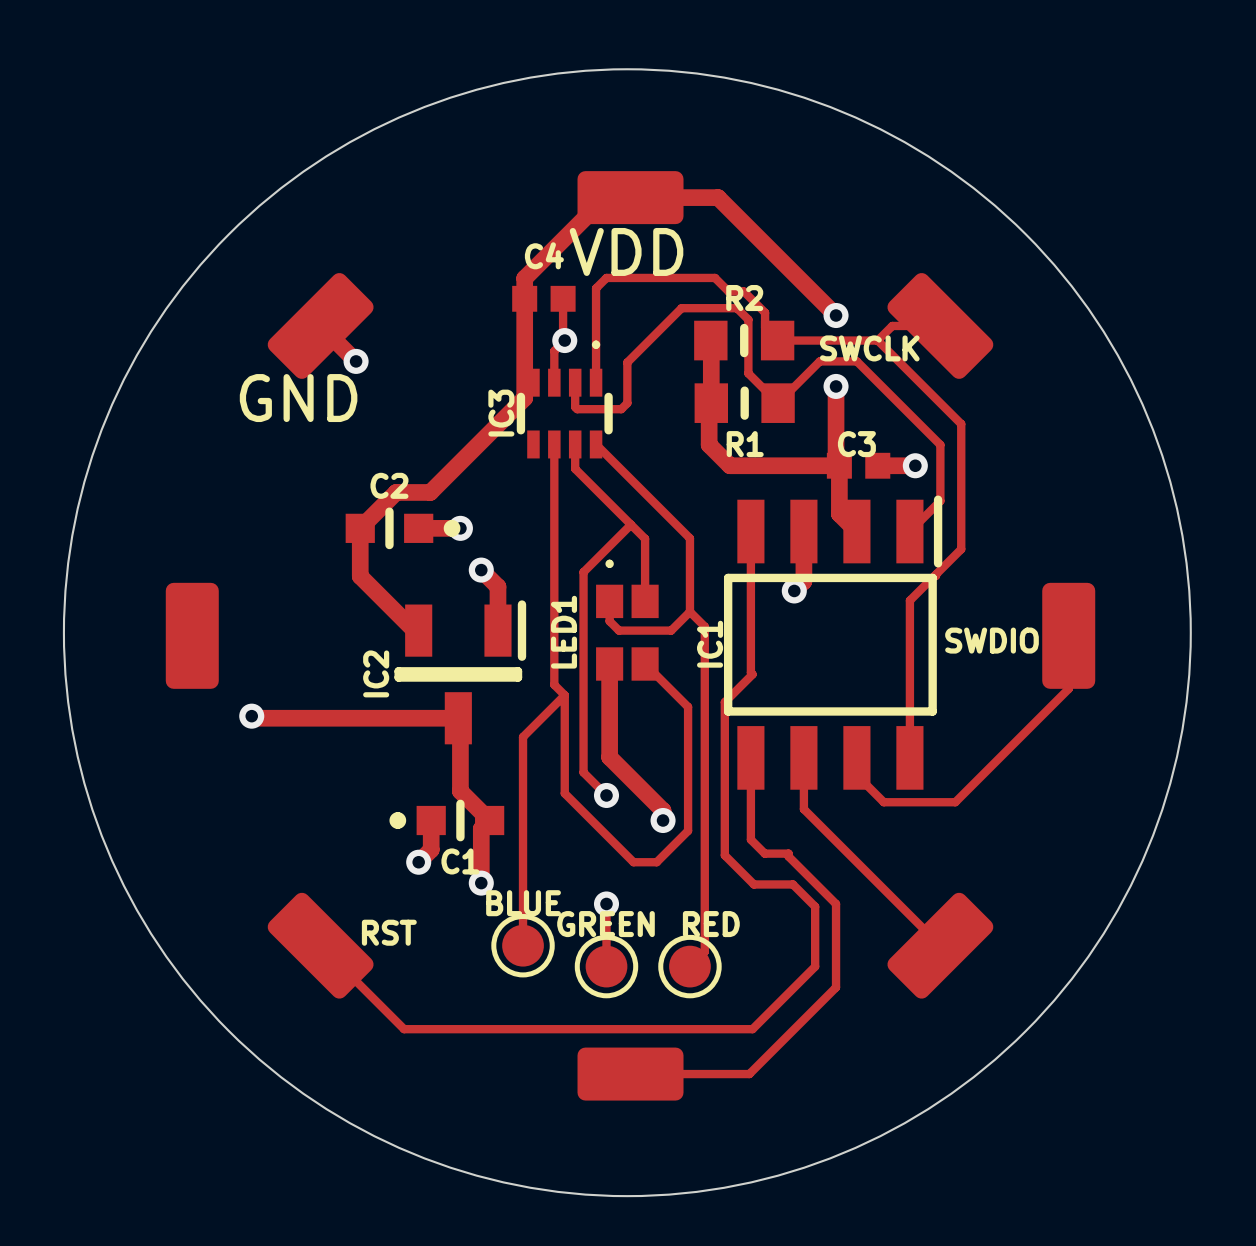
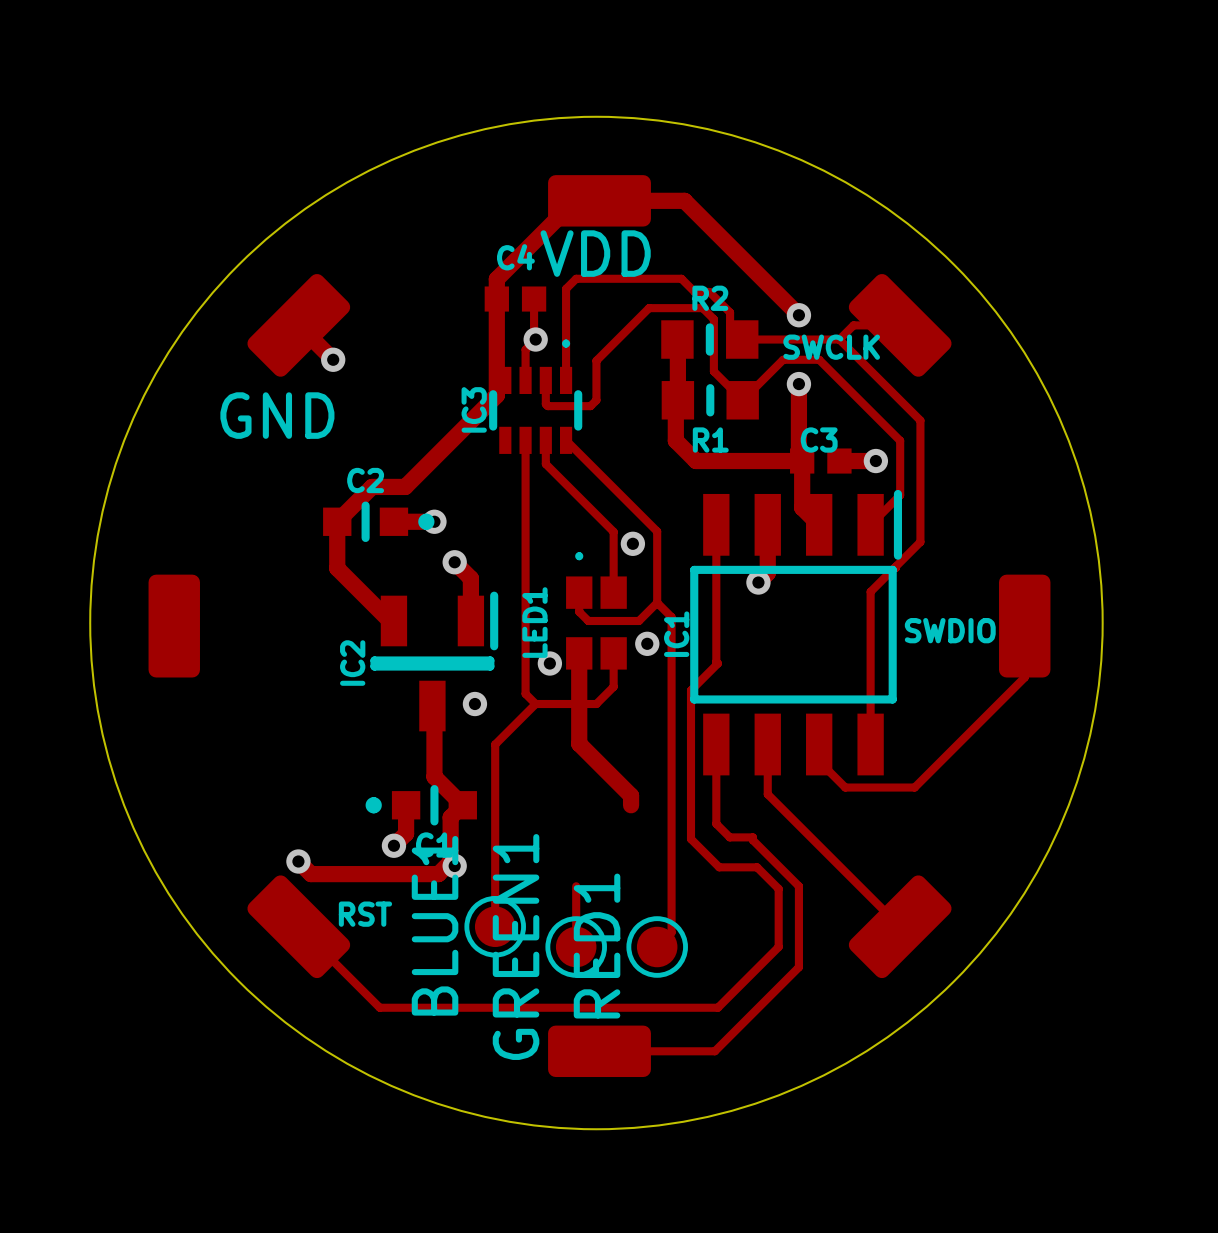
round board edge size: [62, 68, 1192, 1198] -> [89, 115, 1104, 1131]
text position: GND (298, 398) -> GND (277, 415)
track: (631, 524) (583, 572) (583, 772) (606, 795) -> none
via: none -> (632, 543)
via: none -> (647, 643)
track: (645, 663) (688, 706) (688, 830) (656, 862) (633, 862) (564, 793) (564, 695) -> (613, 653) (613, 686) (596, 704) (535, 704)
via: none -> (549, 663)
track: (554, 684) (564, 695) -> (525, 673) (525, 693) (535, 704)
track: (564, 695) (523, 737) (523, 757) -> (535, 704) (495, 744)
track: (251, 716) (253, 718) (458, 718) -> none
via: (251, 716) -> none
via: none -> (474, 704)
via: (606, 795) -> none
via: (663, 820) -> none
track: (481, 828) (481, 883) -> (454, 813) (450, 817) (450, 861) (438, 874) (311, 874) (298, 861)
via: none -> (298, 861)
BLUE name: BLUE (523, 903) -> BLUE1 (435, 925)
via: (606, 903) -> none
GREEN name: GREEN (606, 924) -> GREEN1 (516, 947)
RED name: RED (711, 924) -> RED1 (597, 946)

